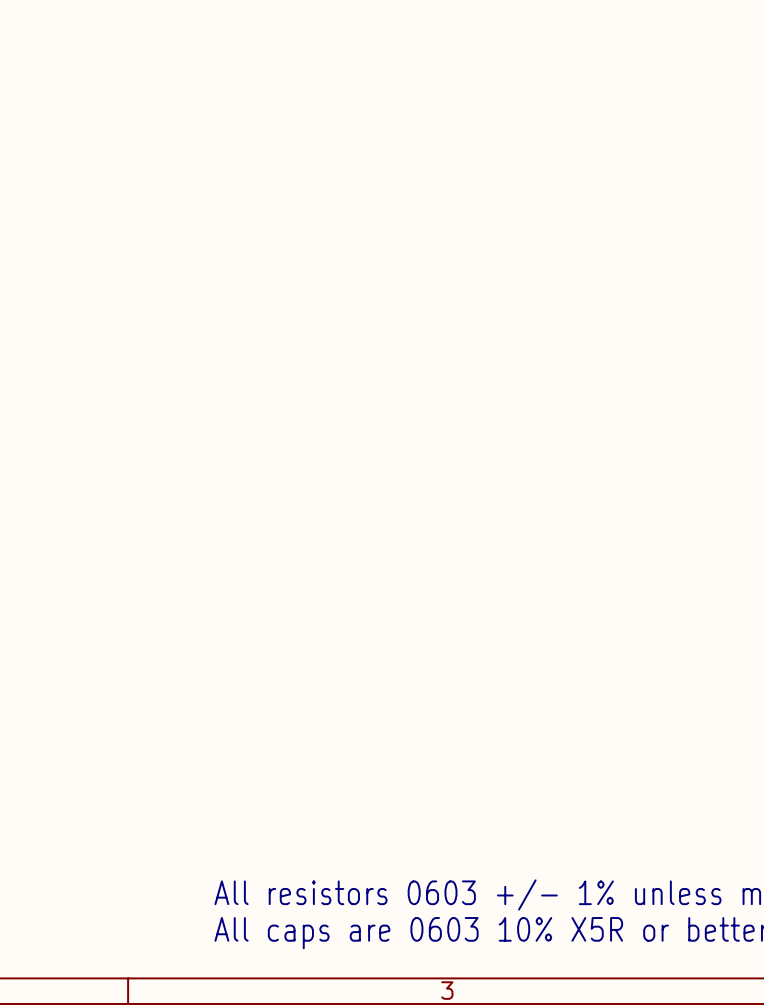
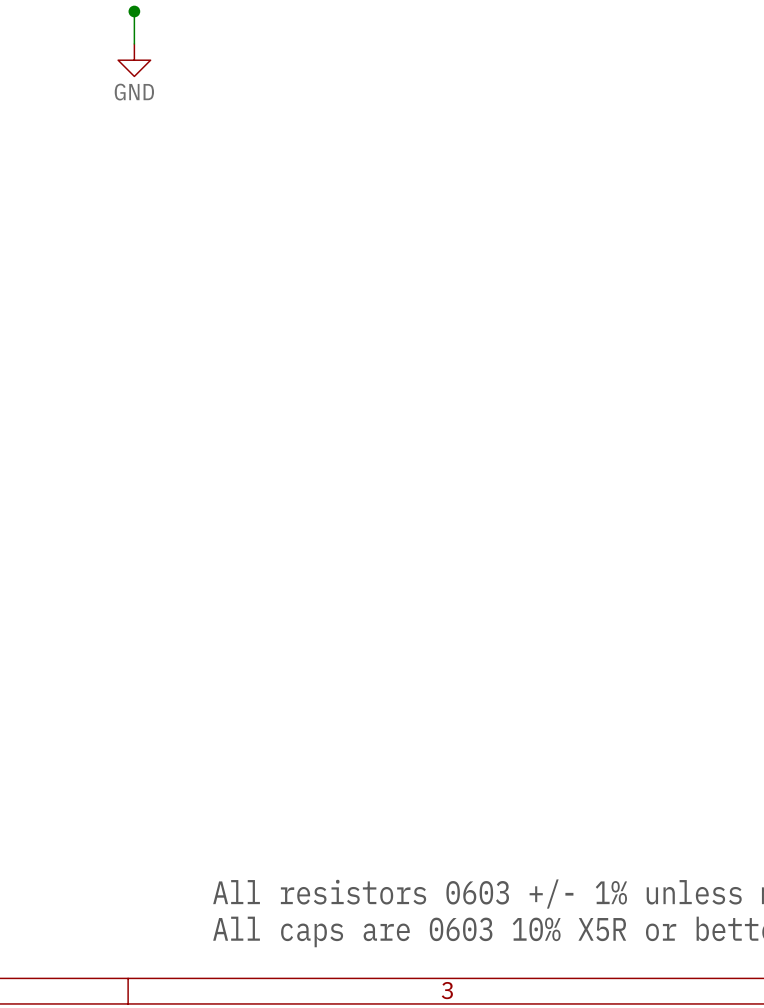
wire: none -> (134, 11) (134, 43)
junction: none -> (134, 11)
power symbol: none -> GND (134, 60)

